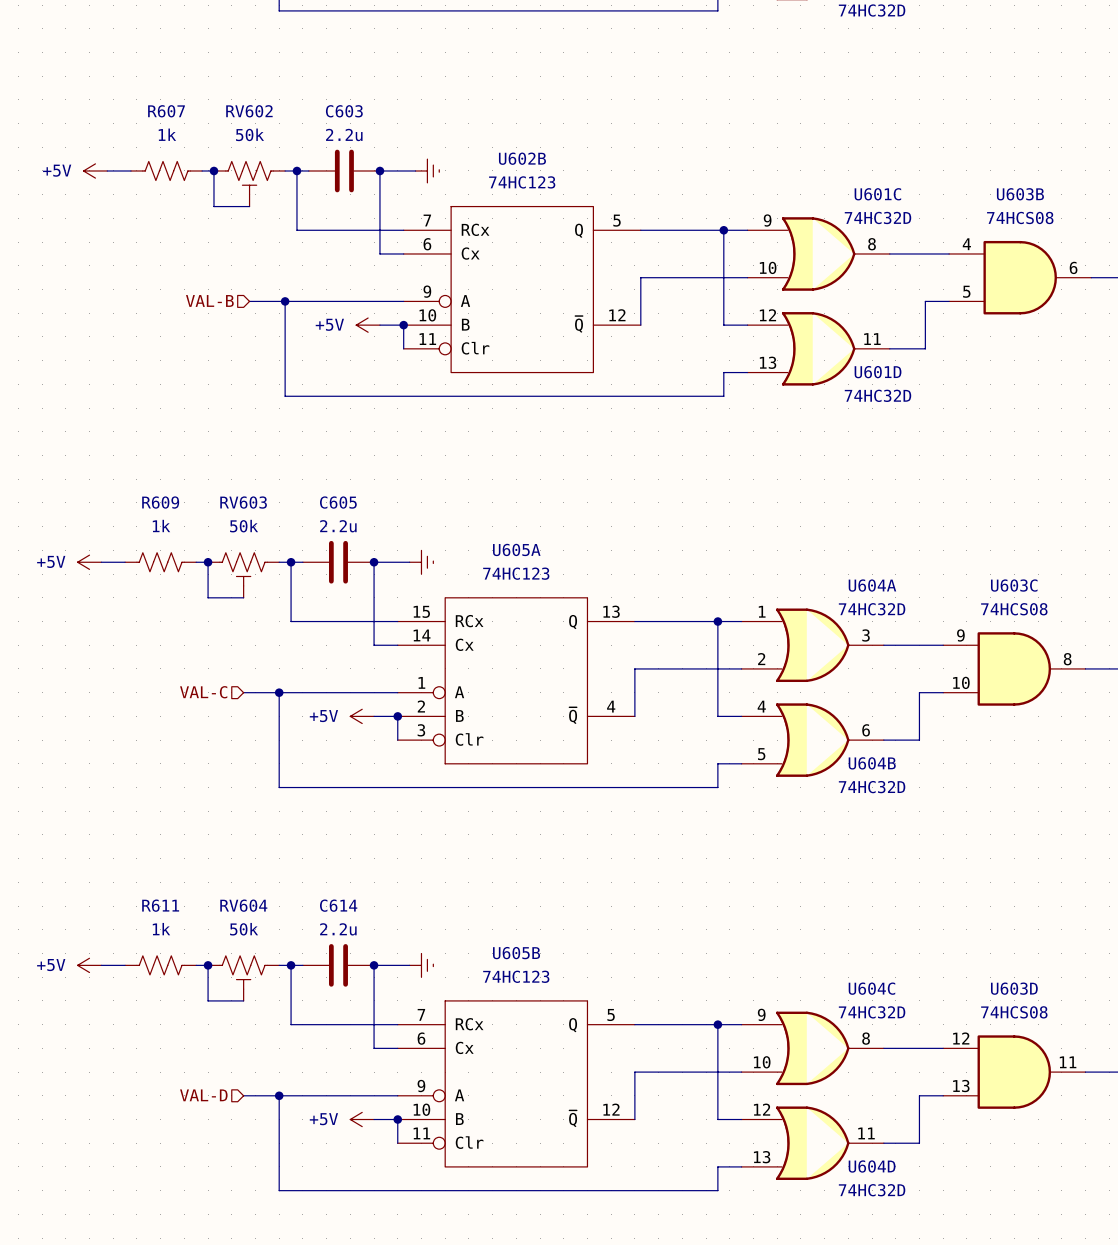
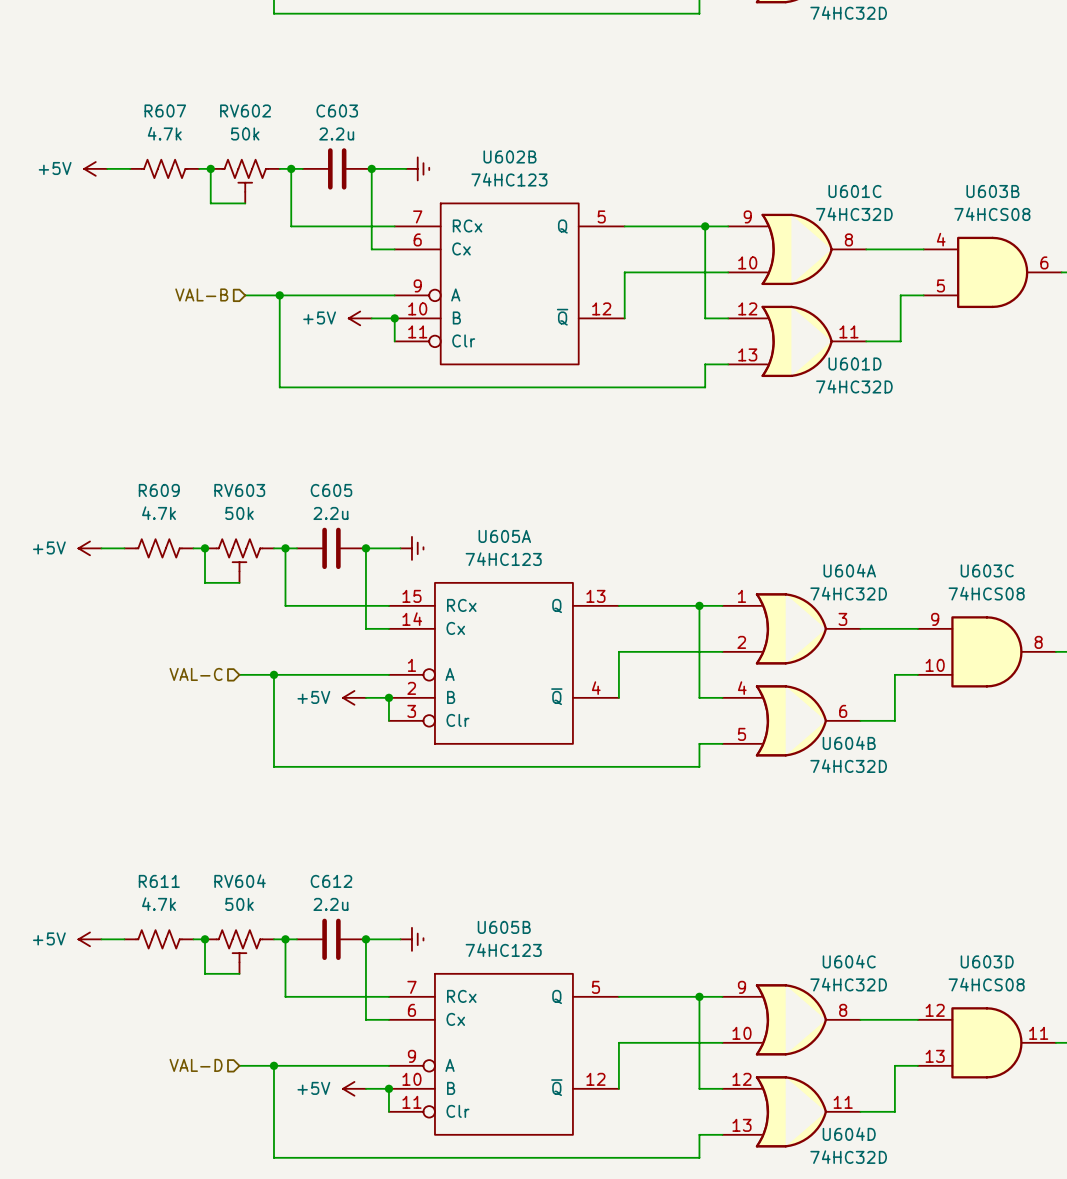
R607 value: 1k (167, 134) -> 4.7k (164, 133)
R609 value: 1k (161, 525) -> 4.7k (159, 513)
C614 name: C614 (338, 905) -> C612 (331, 881)
R611 value: 1k (161, 929) -> 4.7k (159, 904)

